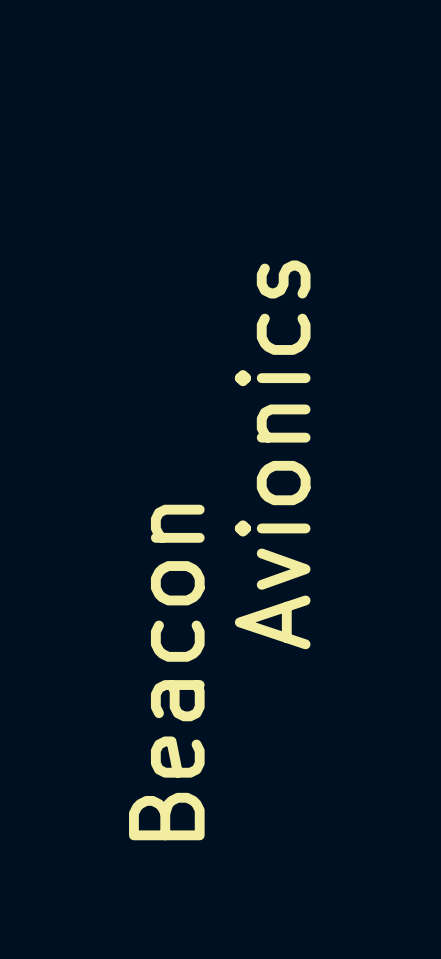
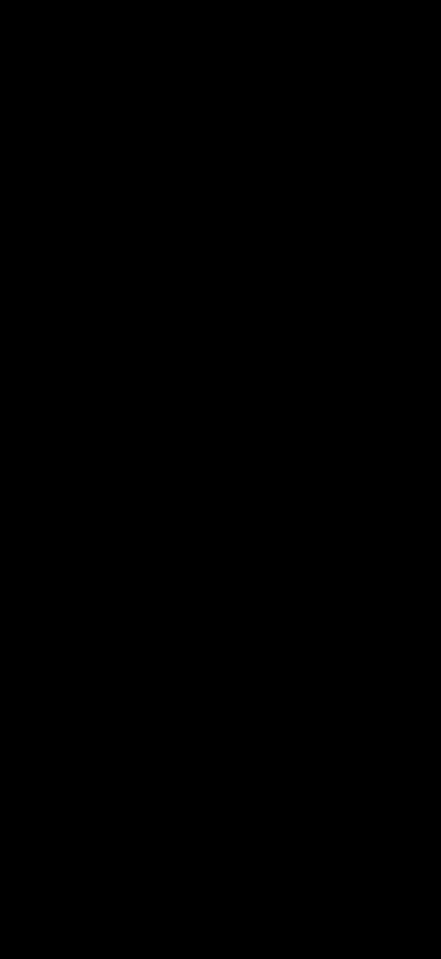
text: Avionics (272, 454) -> none
text: Beacon (166, 672) -> none

